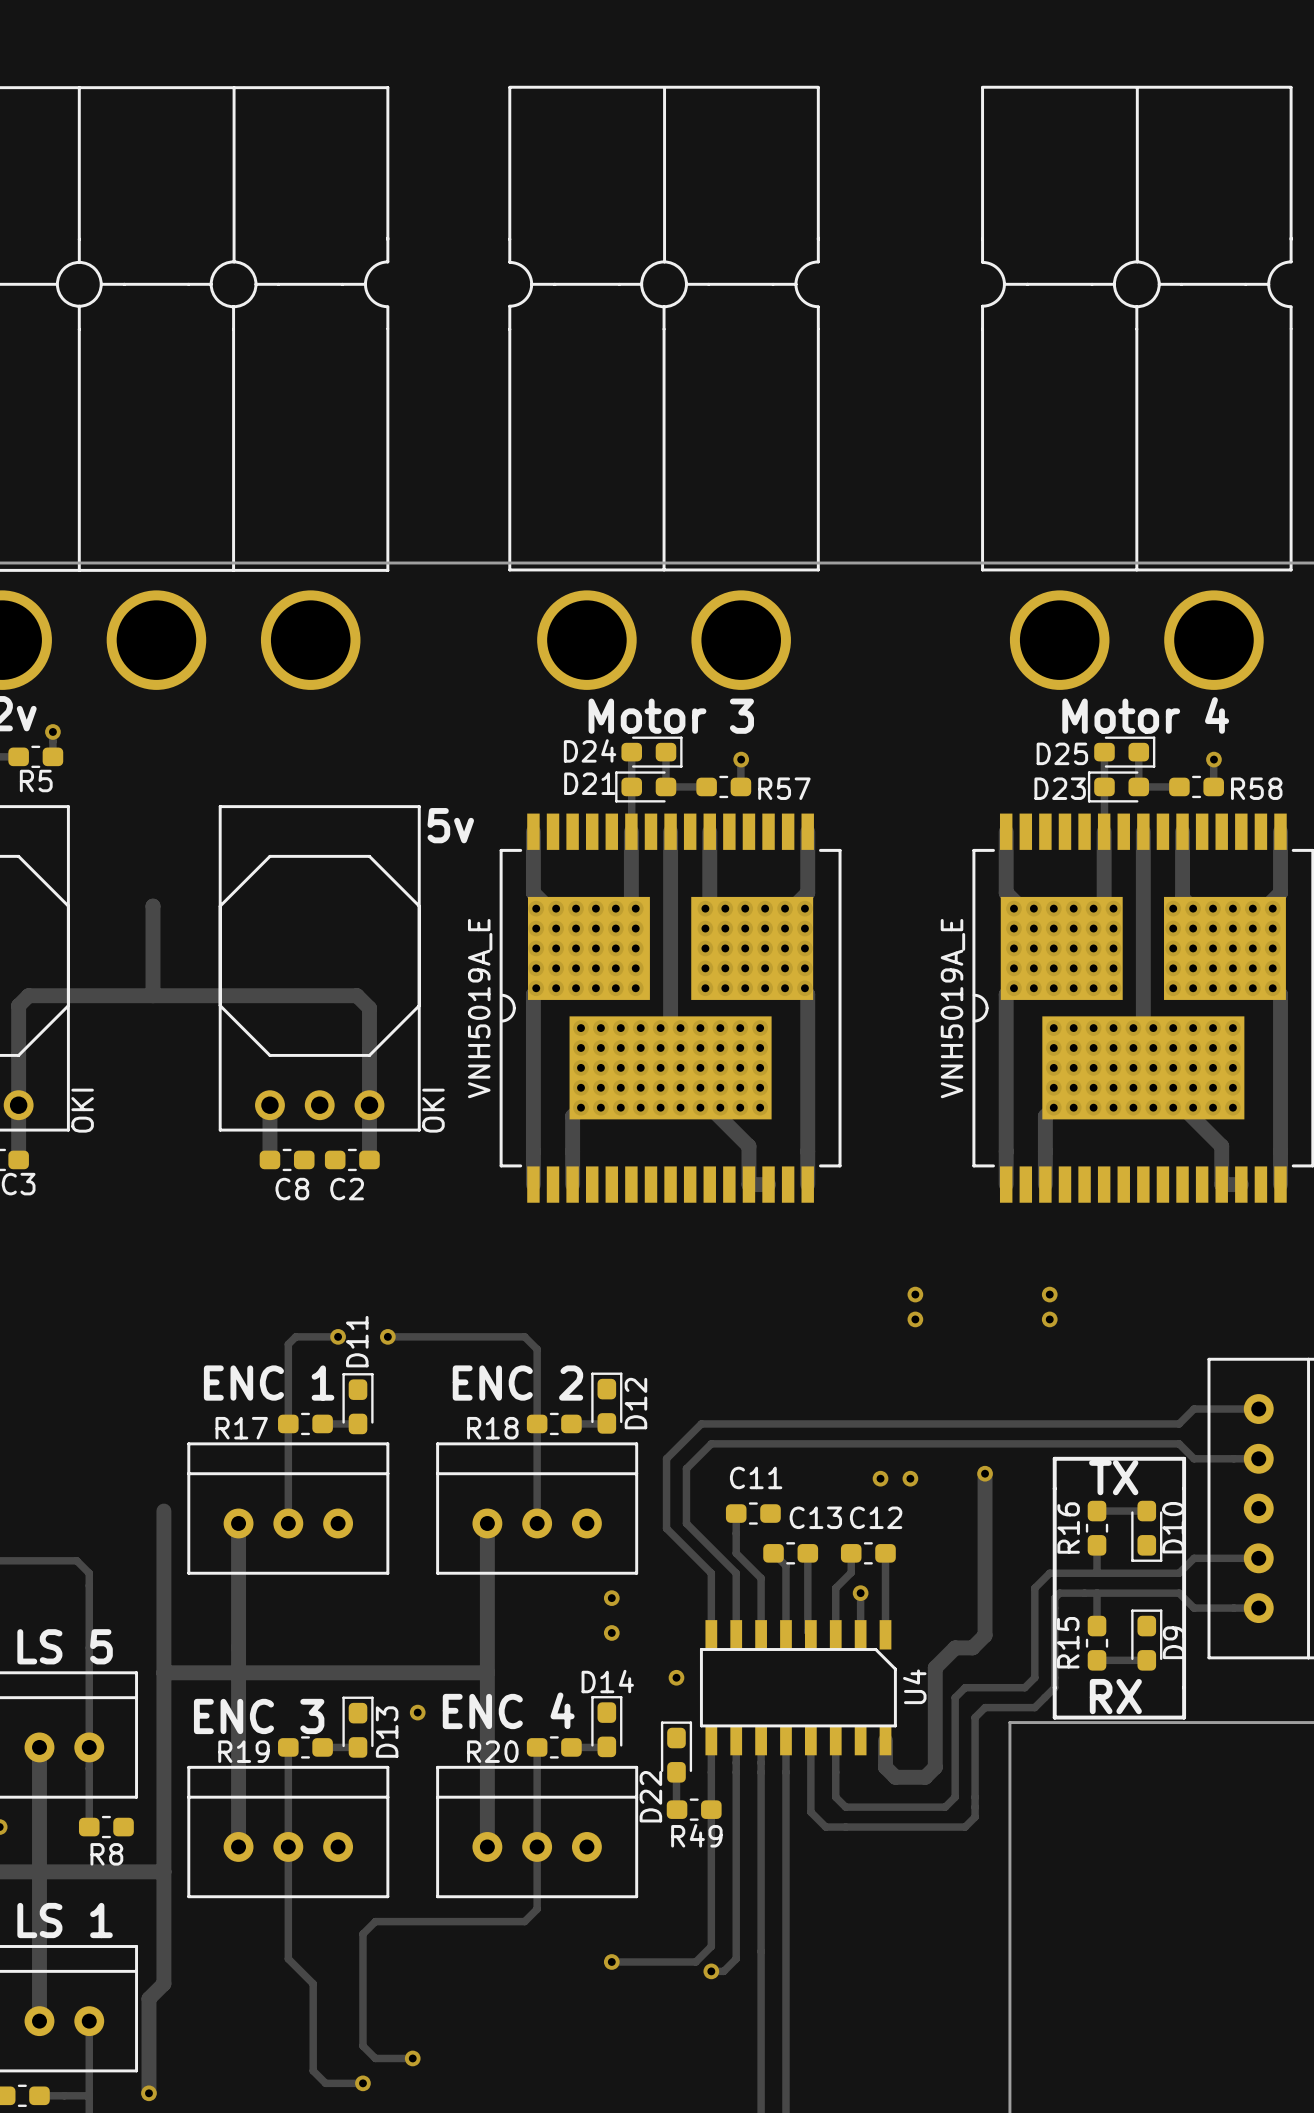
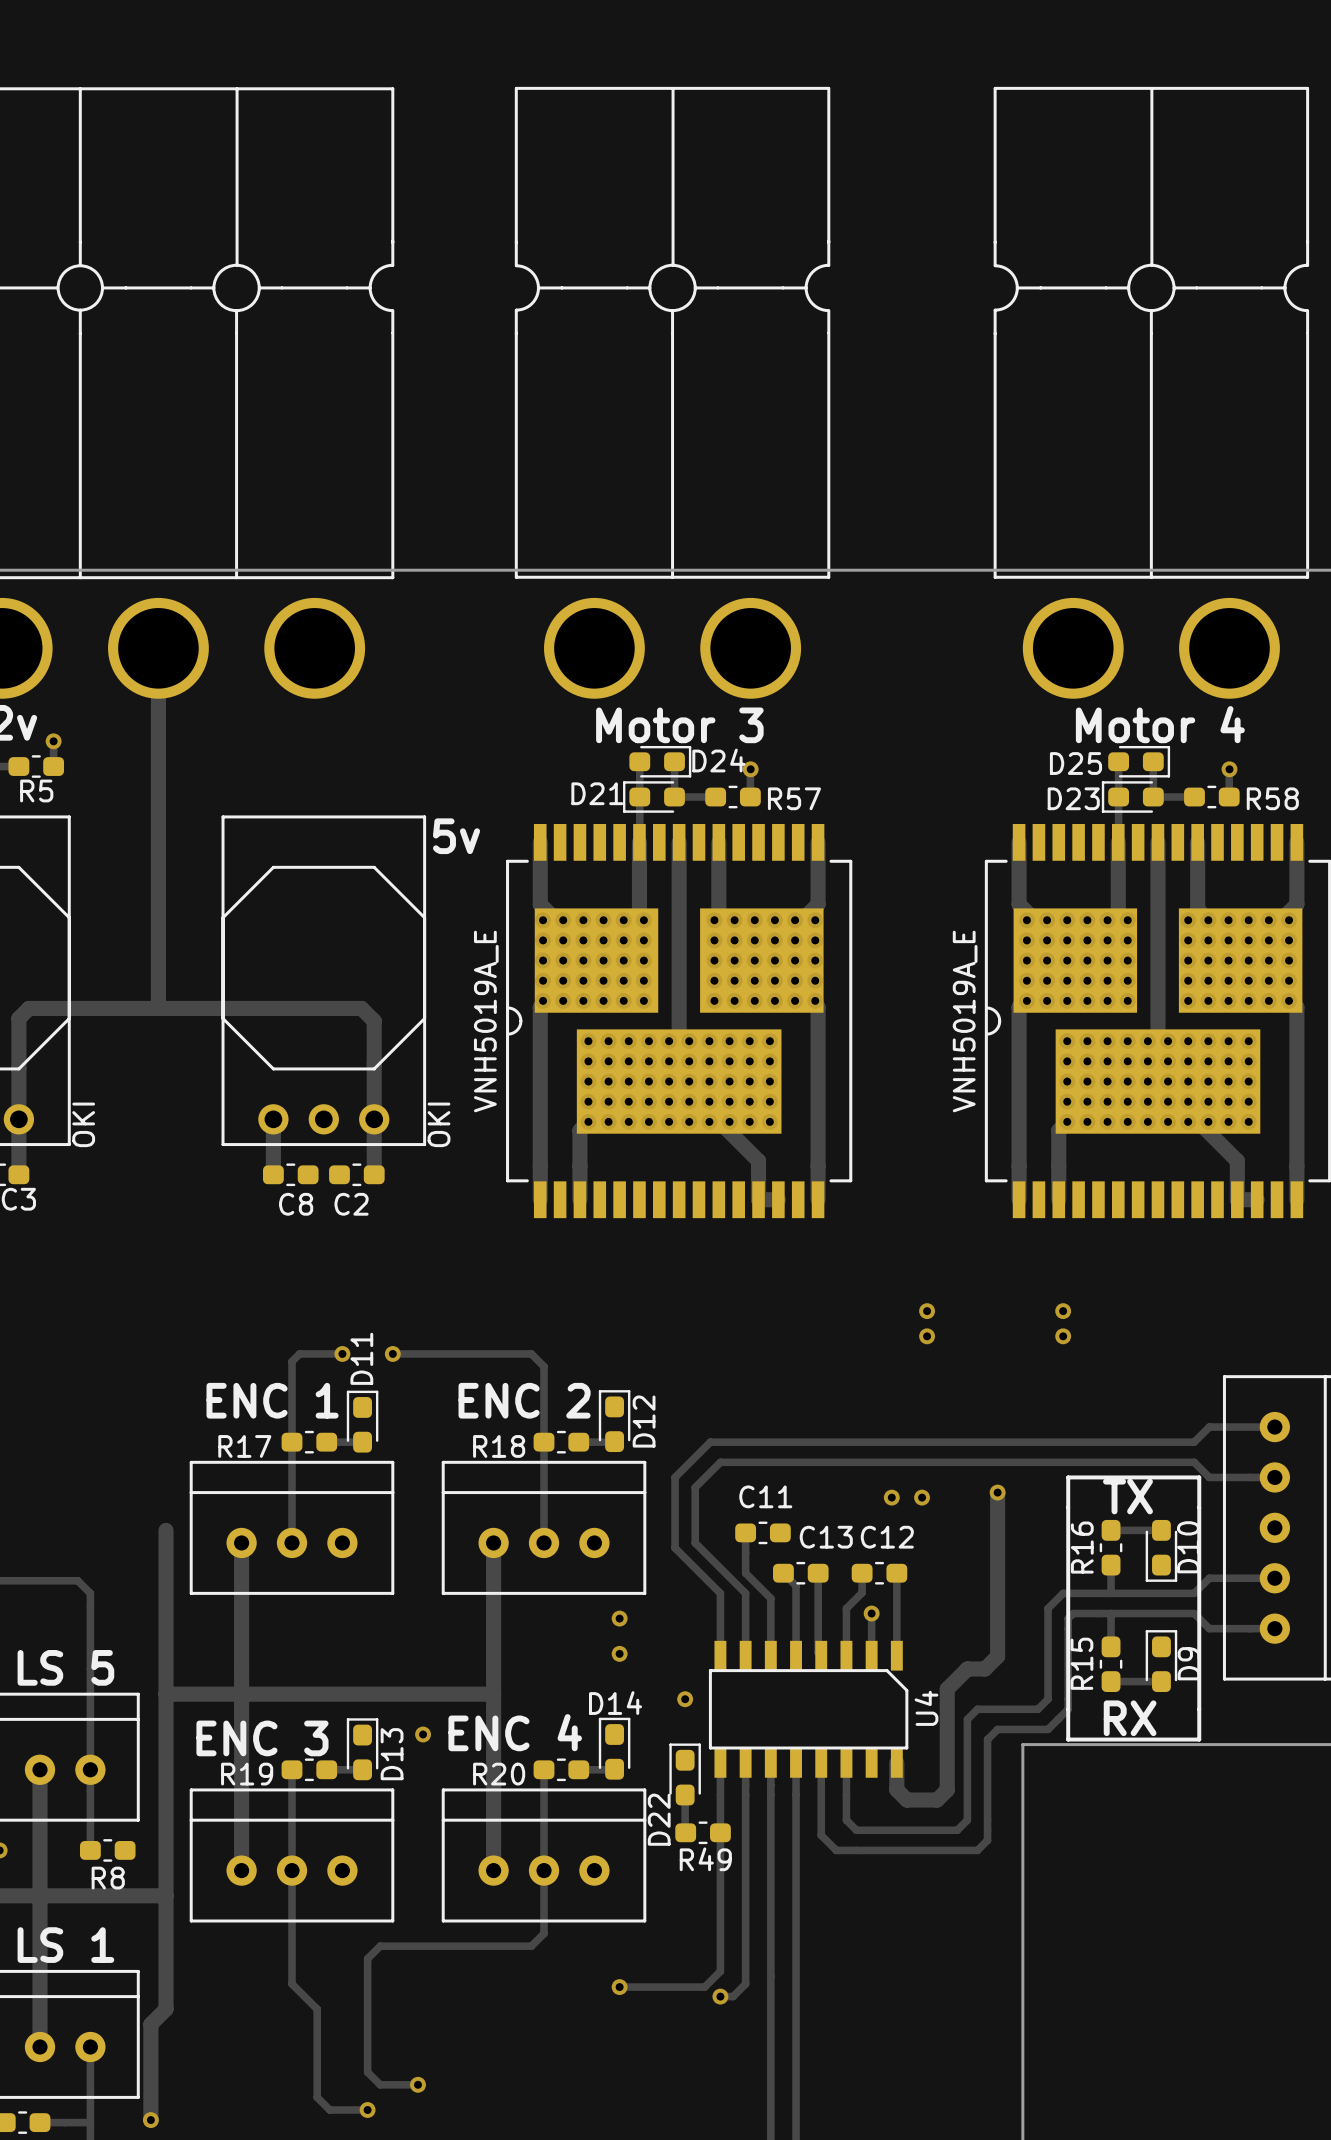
D24 name position: D24 (590, 750) -> D24 (718, 760)
track: (152, 906) (152, 995) -> (158, 648) (158, 1004) (154, 1008)

